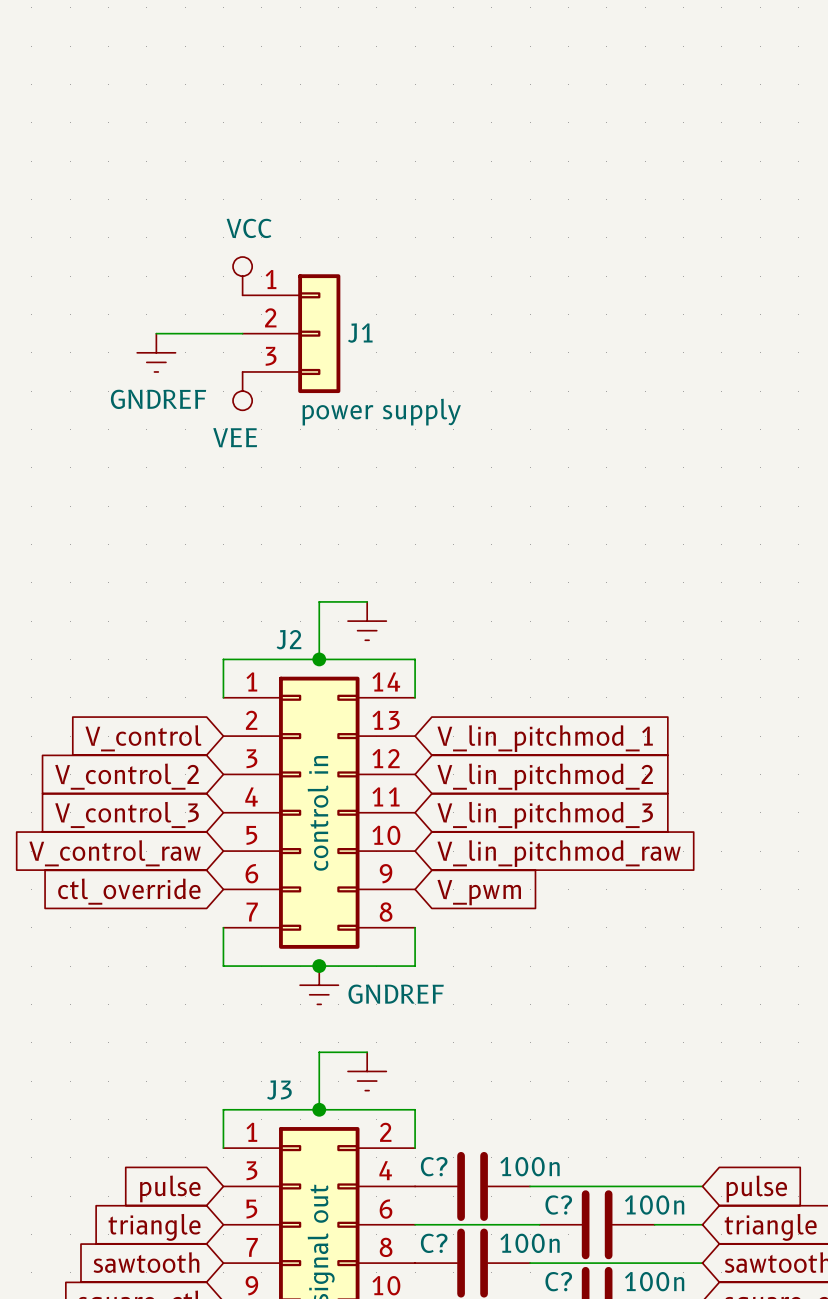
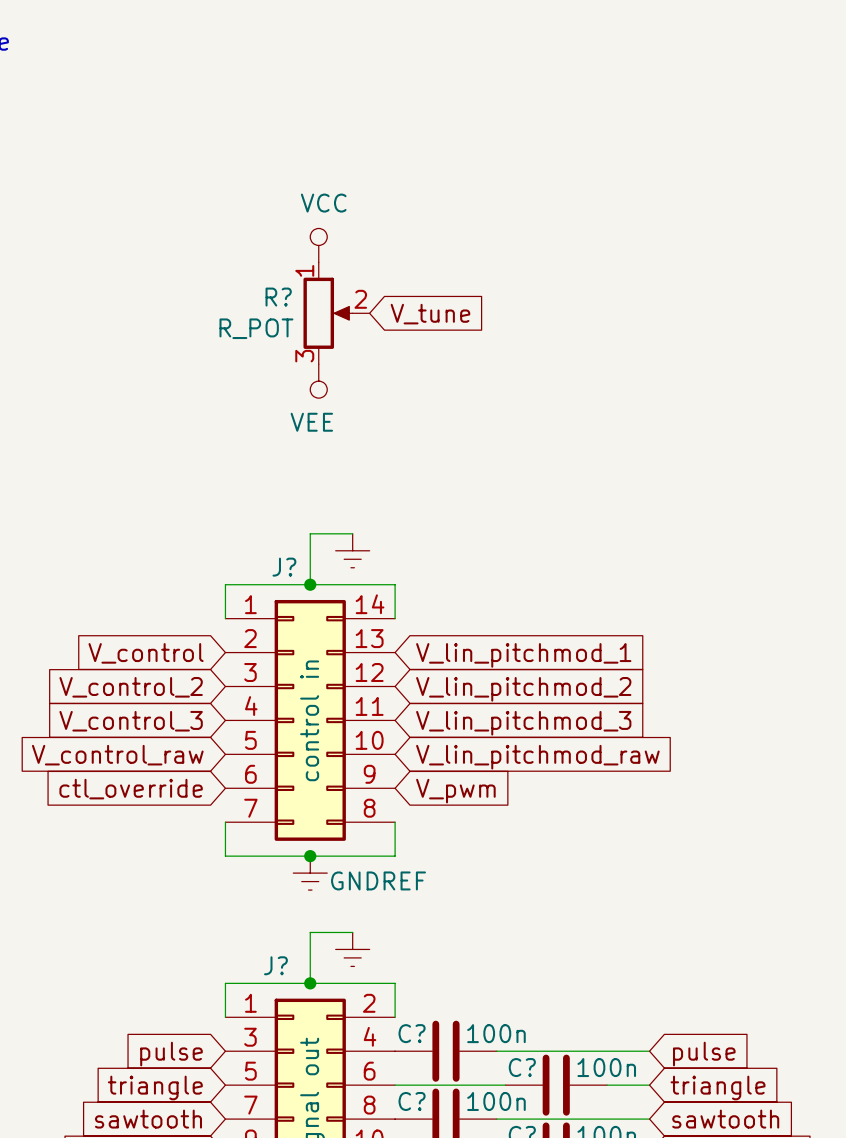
power symbol position: VCC (242, 276) -> VCC (318, 245)
wire: (156, 333) (242, 333) -> none
J1: power supply (291, 333) -> none
power symbol: GNDREF (156, 352) -> none
R?: none -> R_POT (336, 313)
global label: none -> V_tune (430, 314)
power symbol position: VEE (242, 391) -> VEE (318, 381)
J2 name: J2 (288, 639) -> J? (284, 567)
J3 name: J3 (279, 1090) -> J? (275, 965)

